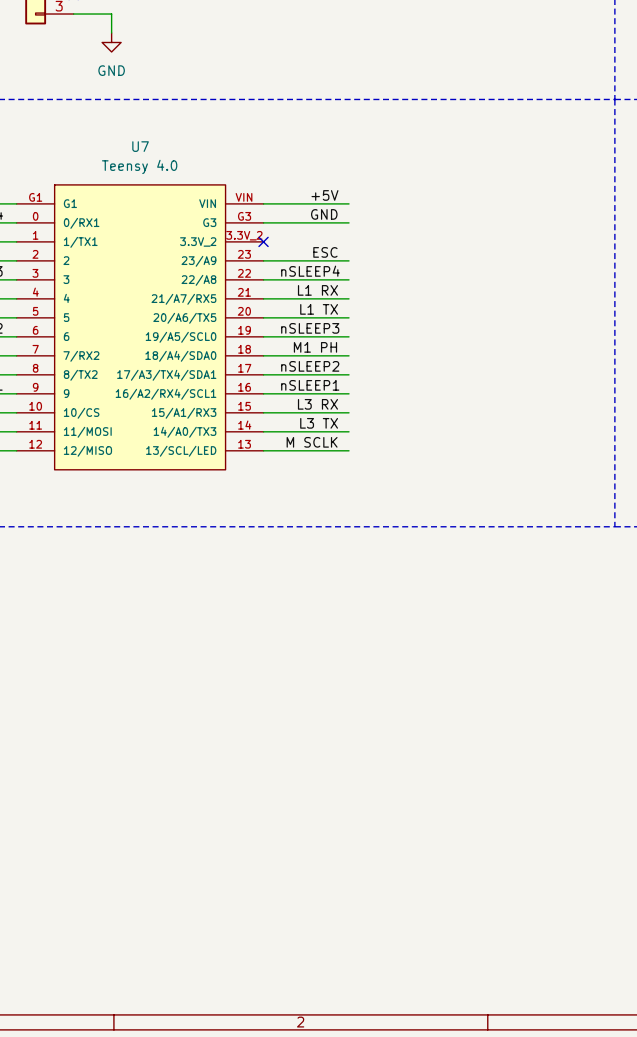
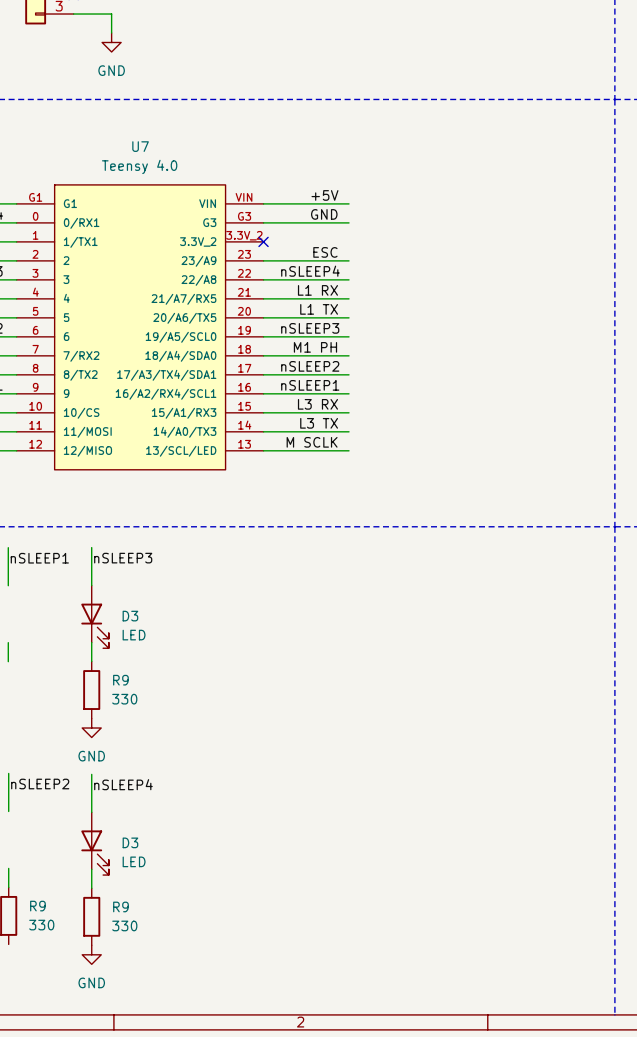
line: none -> (614, 526) (614, 1014)
wire: none -> (8, 547) (8, 585)
wire: none -> (91, 547) (91, 585)
label: none -> nSLEEP1 (39, 558)
label: none -> nSLEEP3 (123, 558)
D3: none -> LED (95, 616)
wire: none -> (8, 642) (8, 661)
wire: none -> (91, 642) (91, 661)
R9: none -> 330 (91, 690)
power symbol: none -> GND (91, 728)
wire: none -> (8, 773) (8, 811)
wire: none -> (91, 774) (91, 812)
label: none -> nSLEEP2 (40, 784)
label: none -> nSLEEP4 (123, 784)
D3: none -> LED (95, 843)
wire: none -> (8, 868) (8, 887)
wire: none -> (91, 869) (91, 888)
R9: none -> 330 (8, 915)
R9: none -> 330 (91, 916)
power symbol: none -> GND (91, 954)

